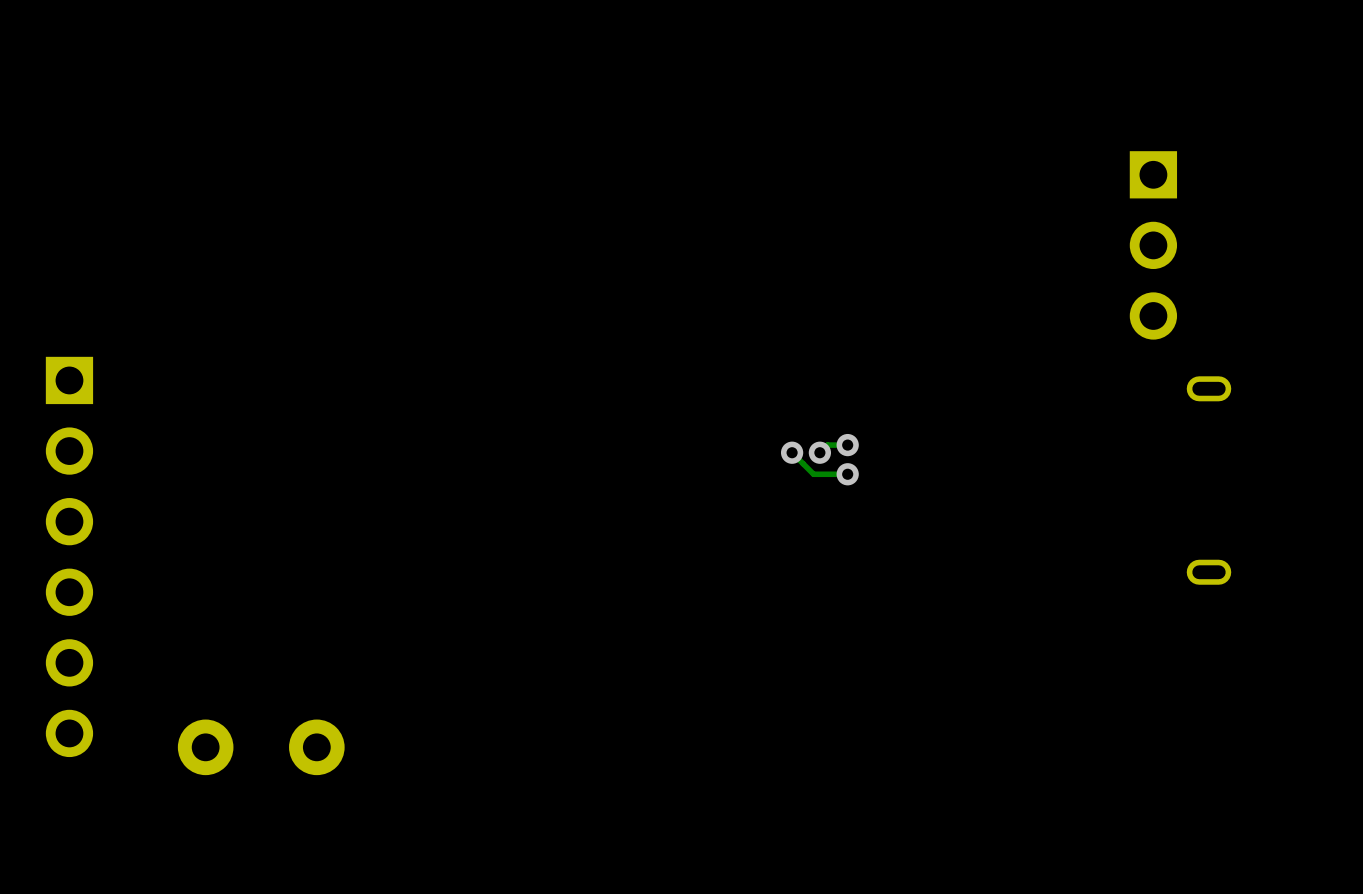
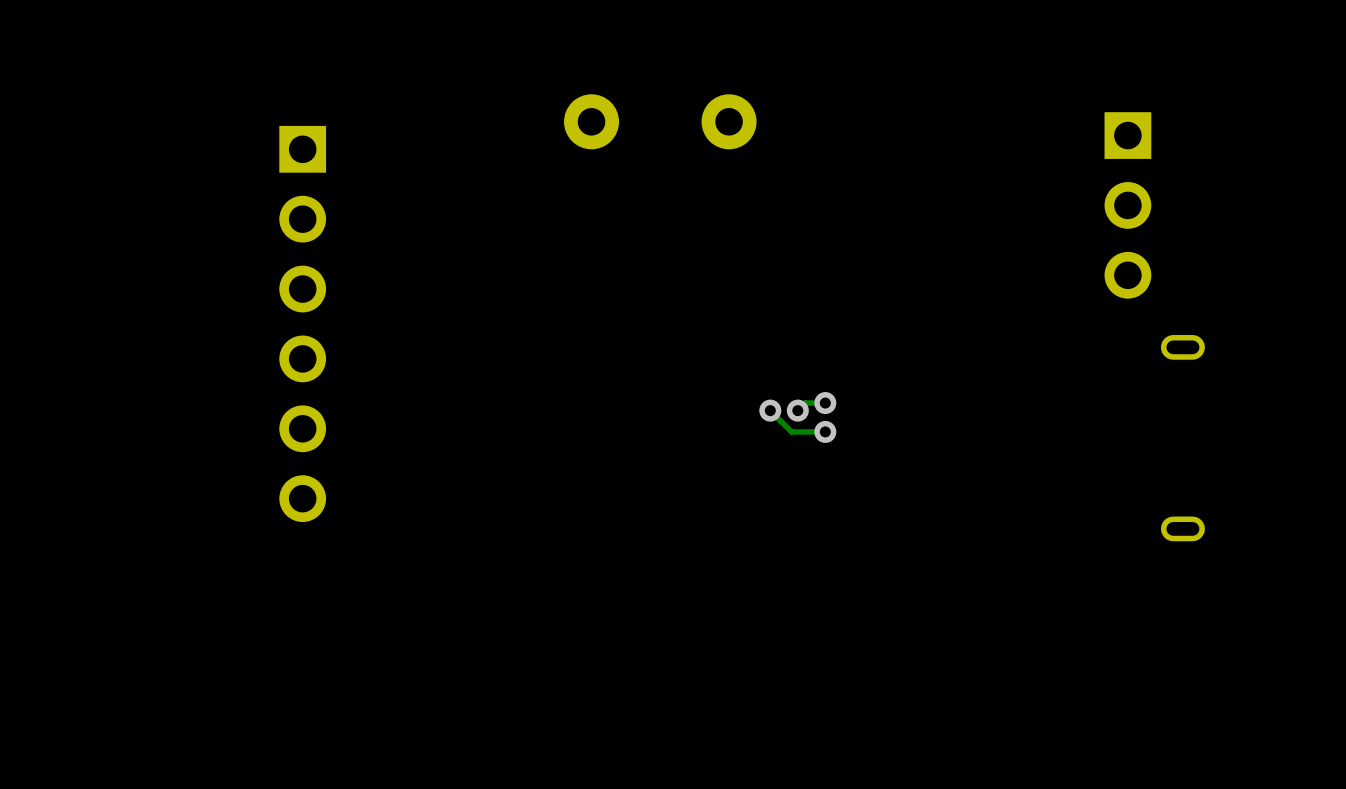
part: none -> (591, 121)
part: none -> (729, 121)
part position: (69, 556) -> (302, 323)
part: (205, 747) -> none
part: (316, 747) -> none

